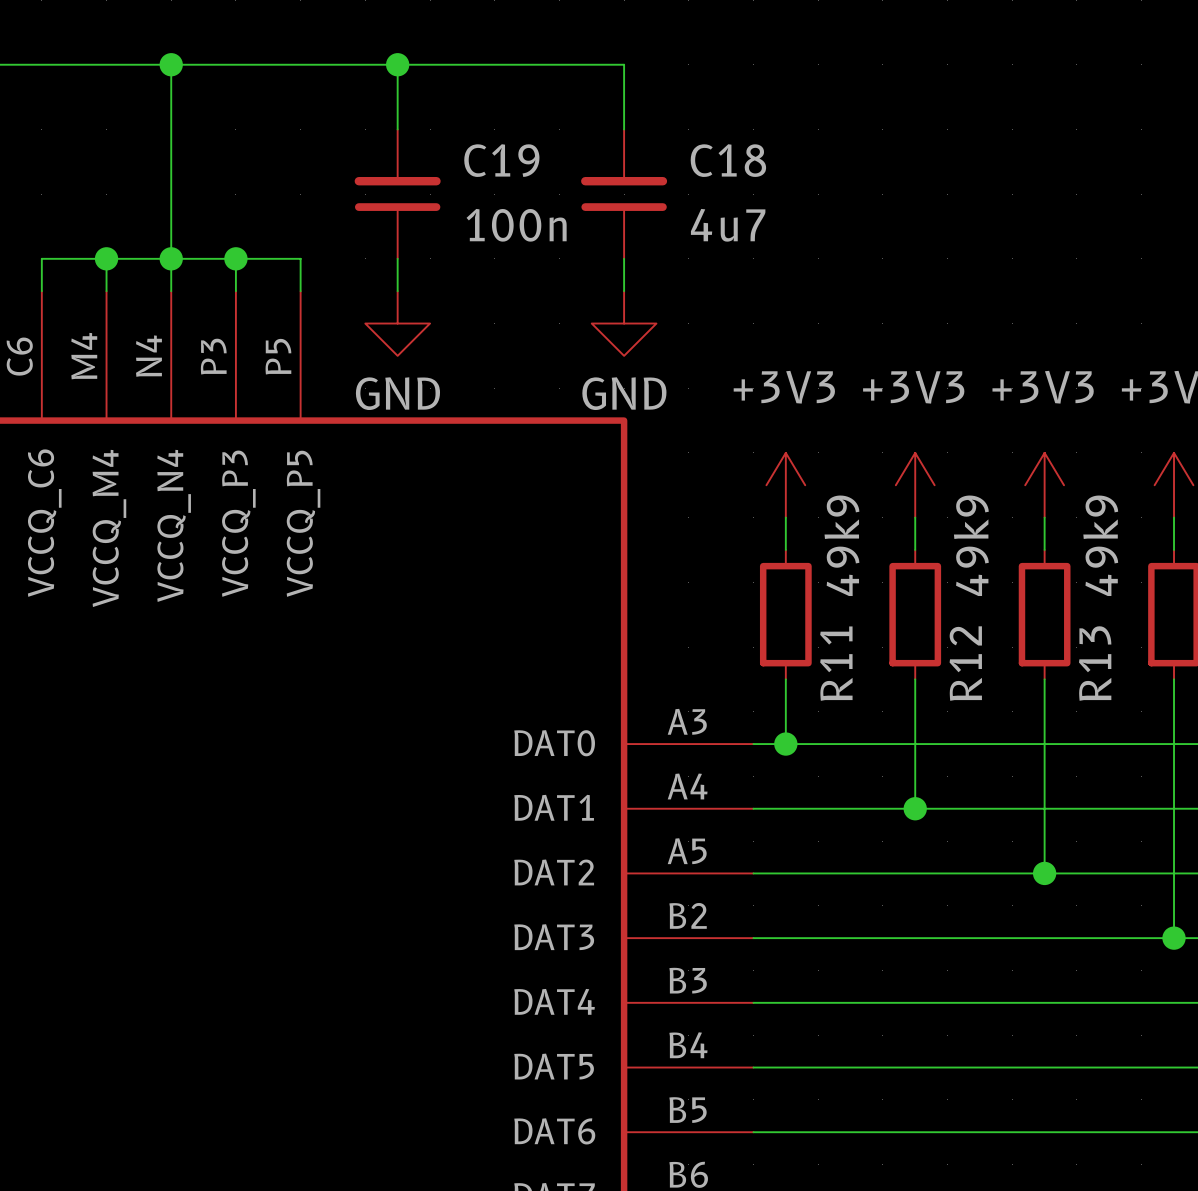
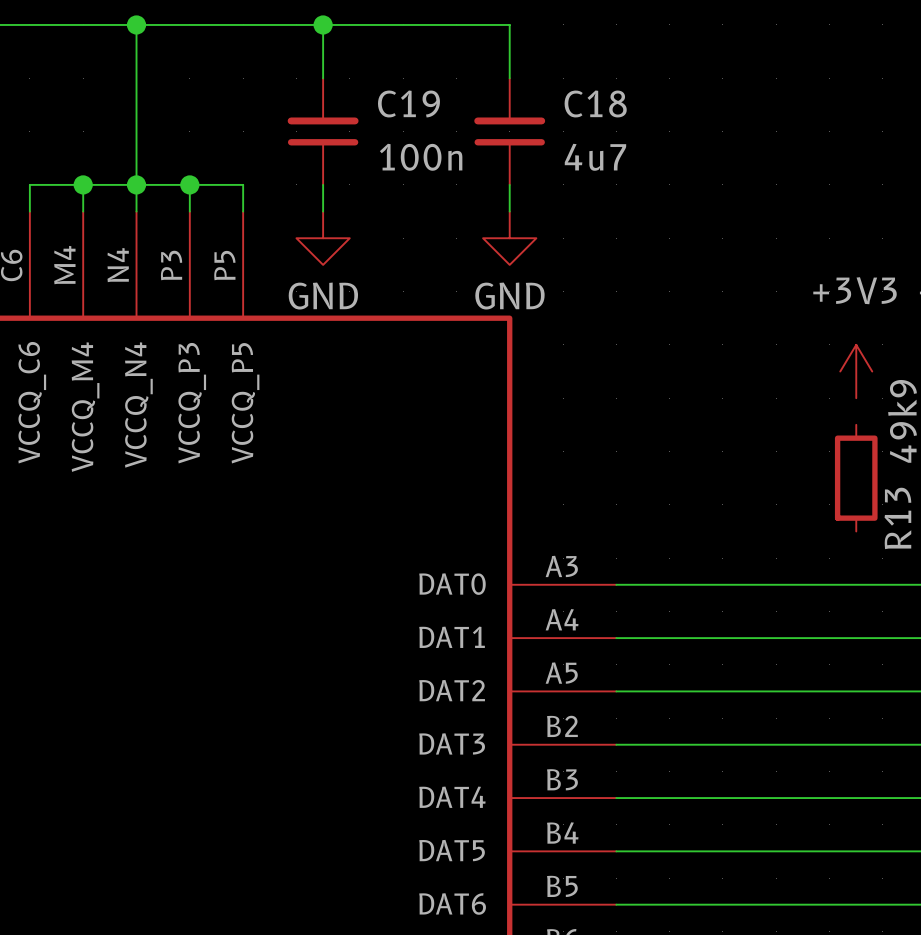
power symbol: +3V3 (785, 485) -> none
power symbol: +3V3 (915, 485) -> none
wire: (785, 517) (785, 549) -> none
wire: (915, 517) (915, 549) -> none
wire: (1044, 517) (1044, 549) -> none
R11: (785, 614) -> none
R12: (915, 614) -> none
wire: (785, 679) (785, 744) -> none
wire: (915, 679) (915, 808) -> none
wire: (1044, 679) (1044, 873) -> none
junction: (785, 744) -> none
junction: (915, 808) -> none
junction: (1044, 873) -> none

